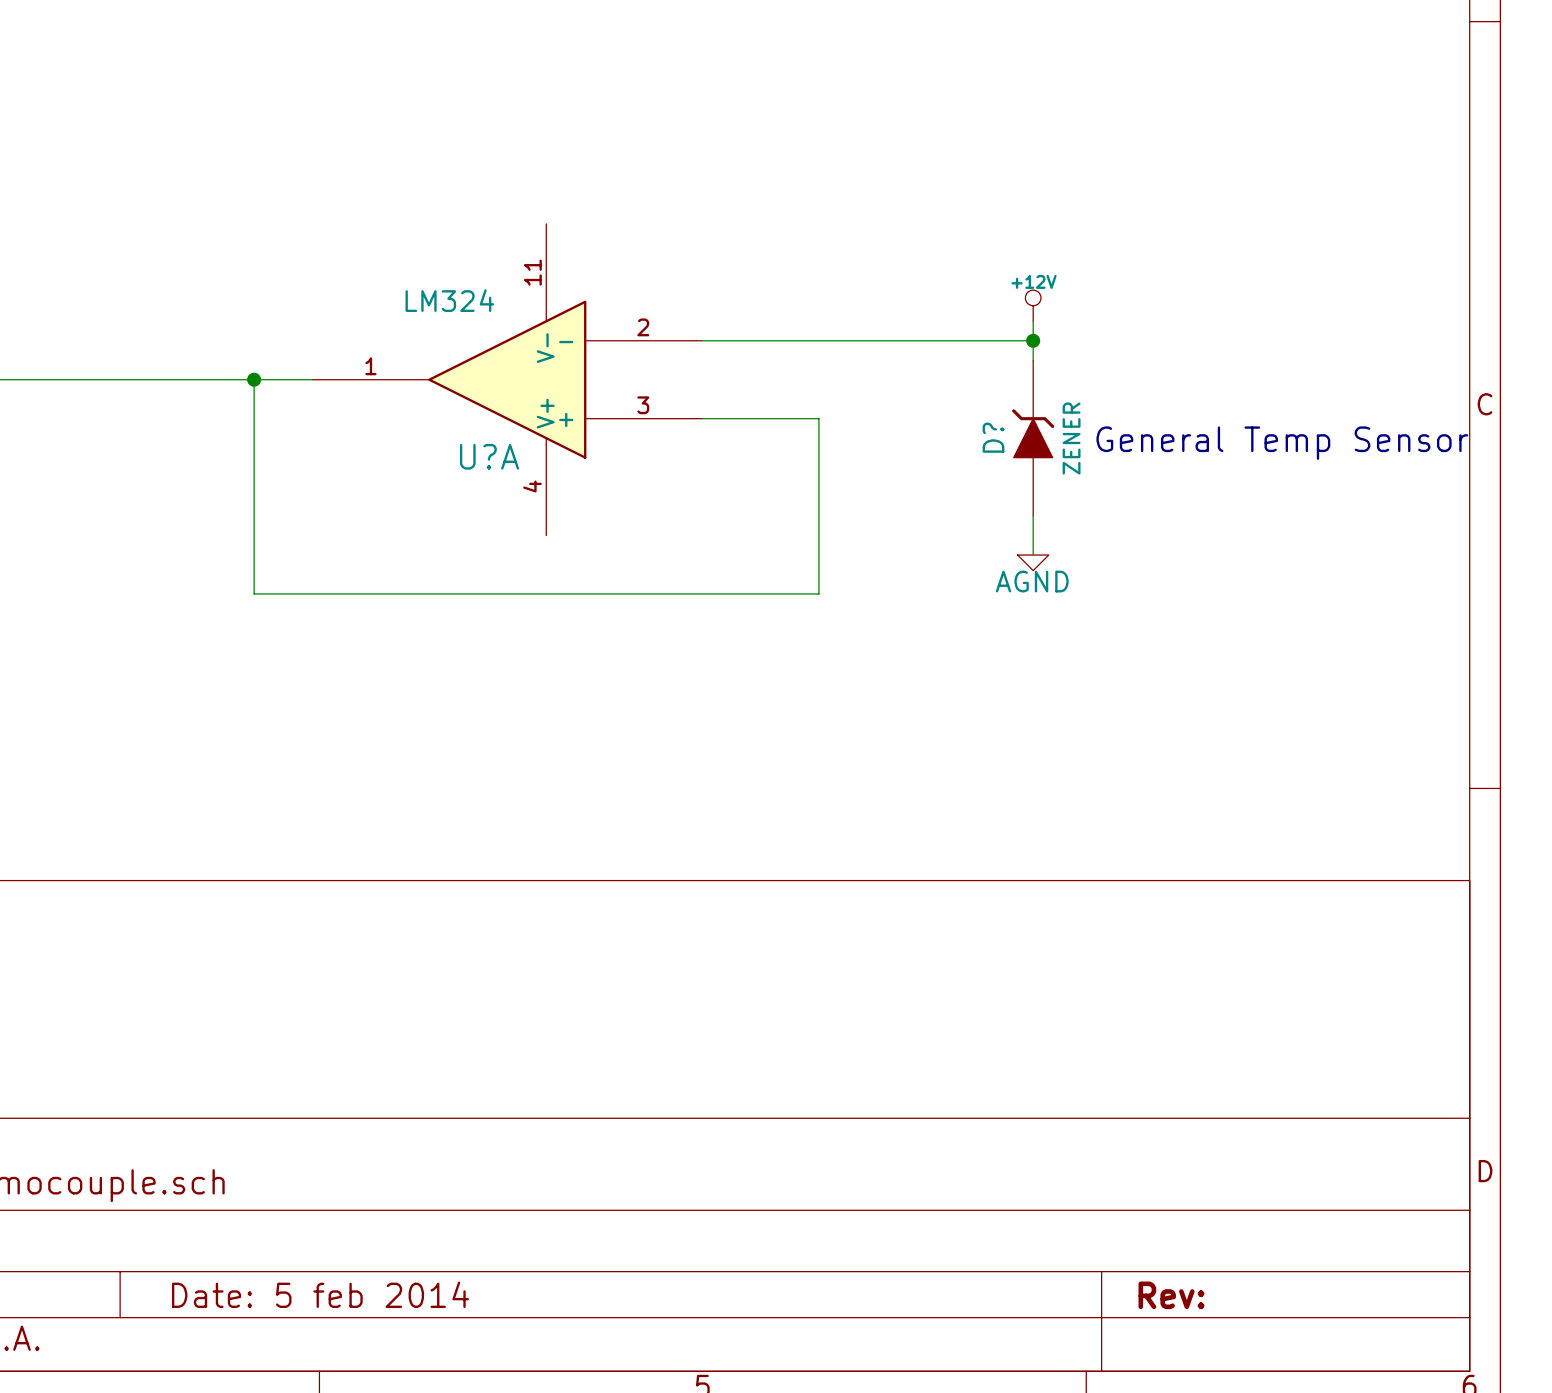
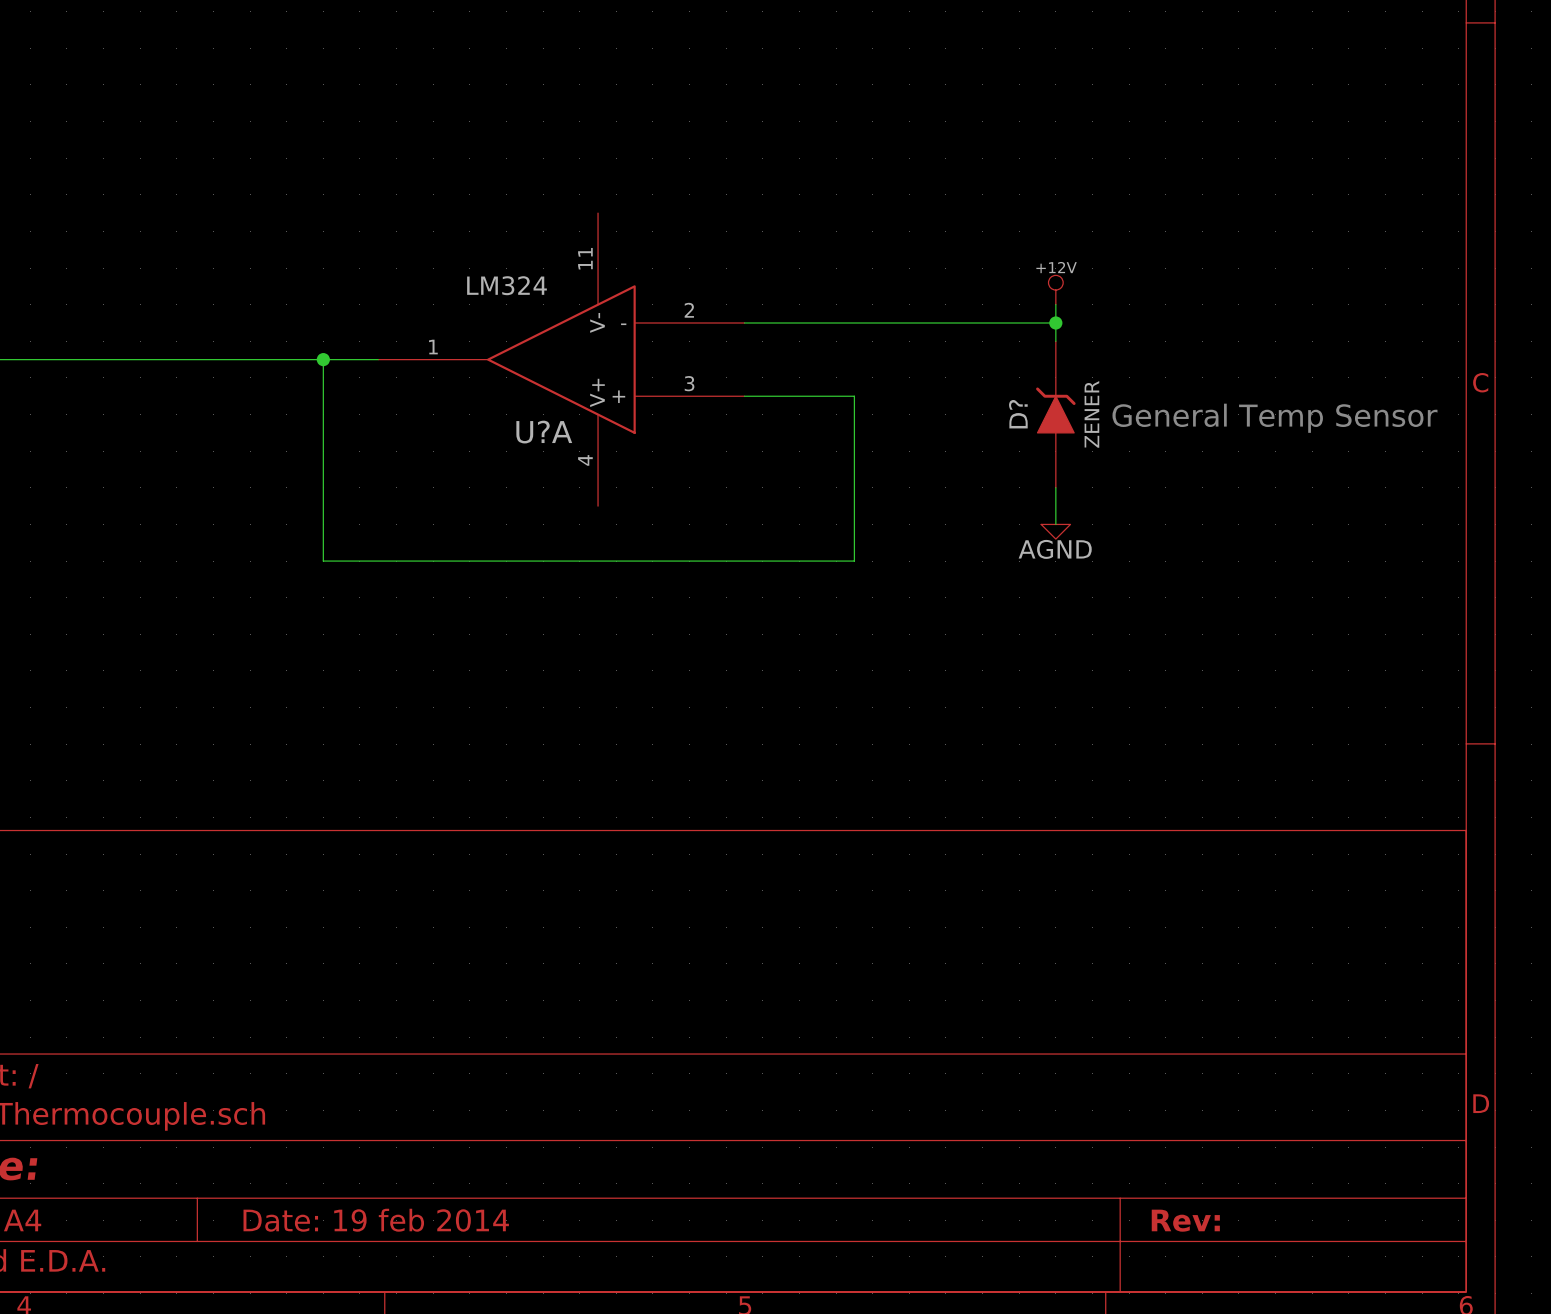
title block: Date: 5 feb 2014 (320, 1294) -> Date: 19 feb 2014 (376, 1220)

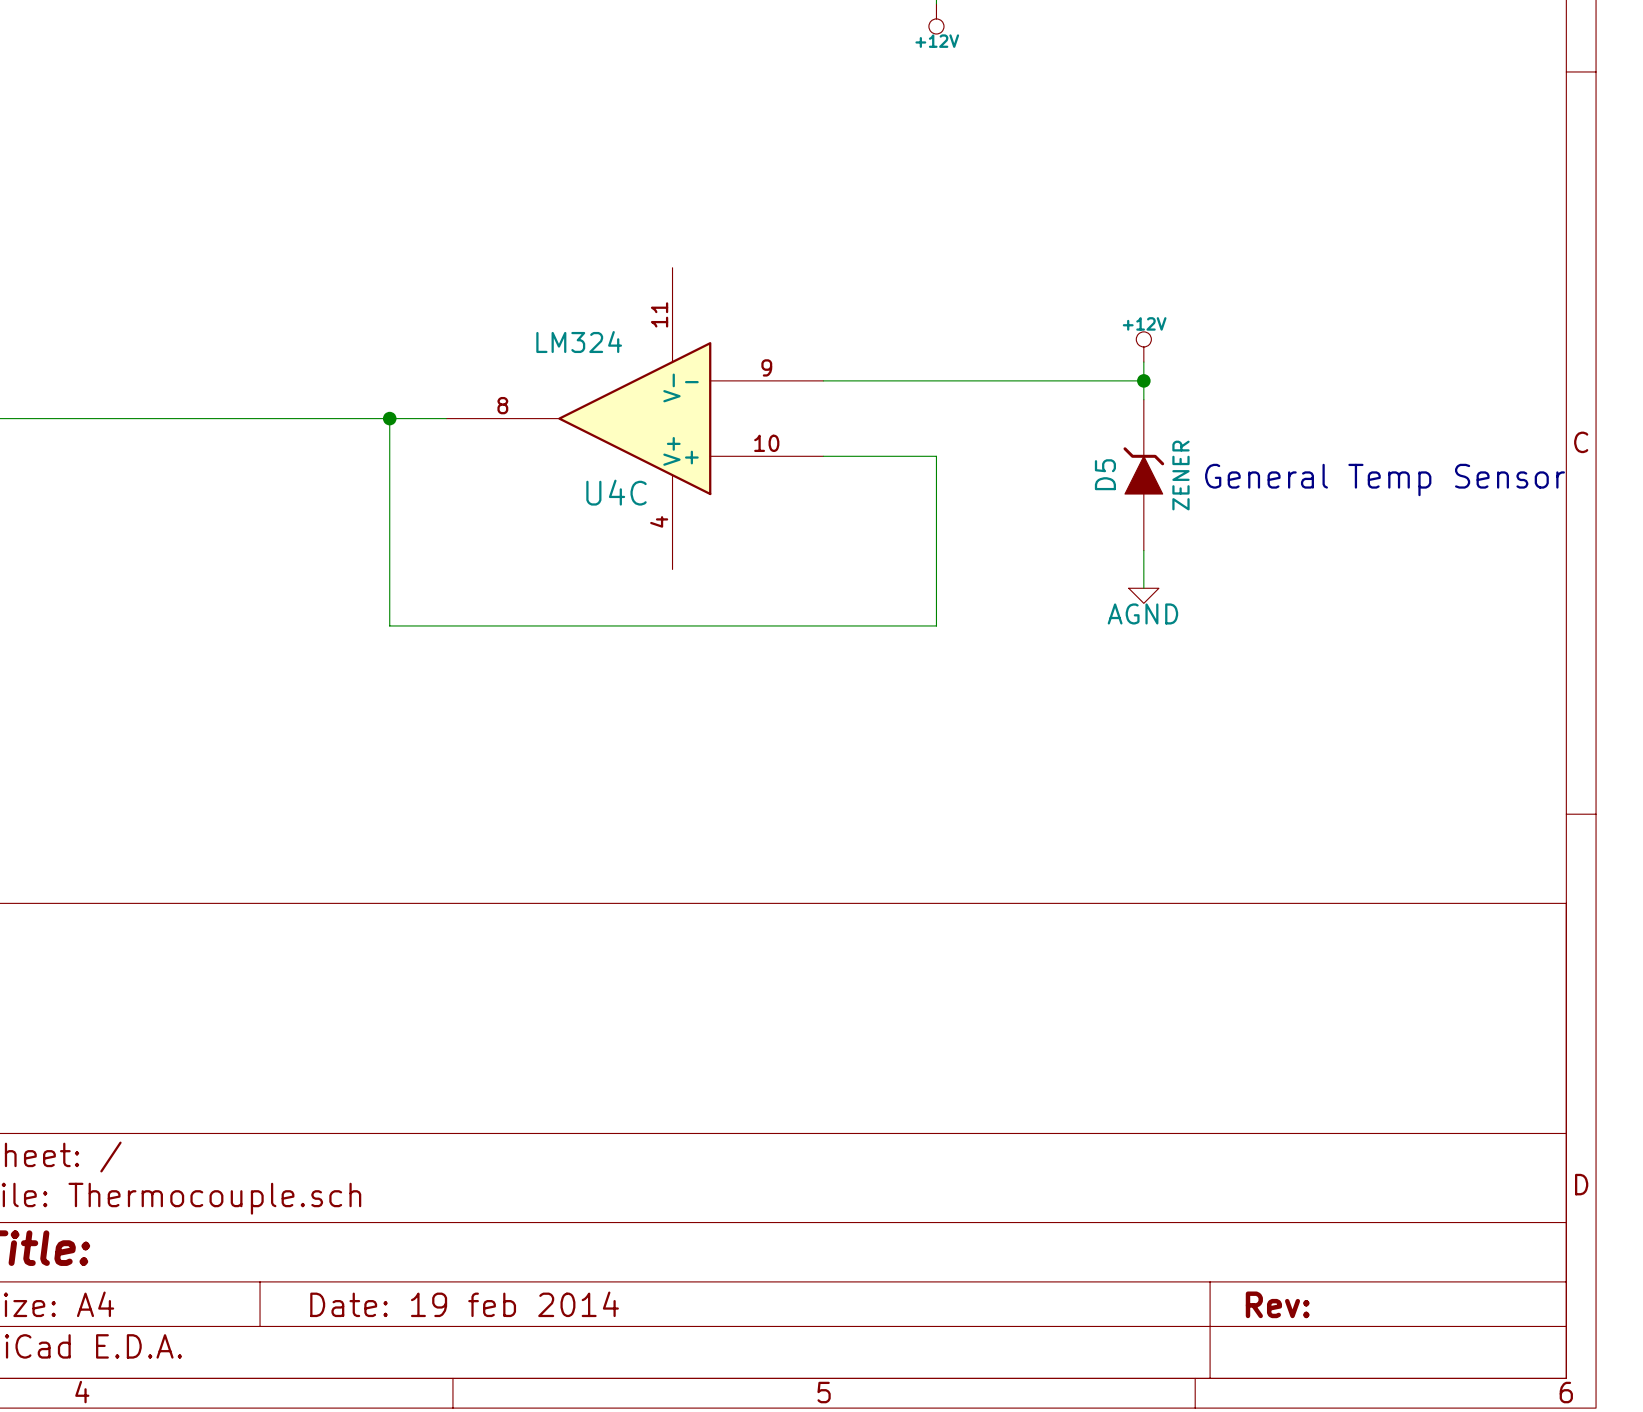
U?A pin number: 2 (689, 310) -> 9 (766, 367)
U?A pin number: 1 (433, 347) -> 8 (502, 405)
U?A pin number: 3 (689, 383) -> 10 (766, 443)
D? name: D? (1018, 414) -> D5 (1105, 474)
U?A name: U?A (544, 432) -> U4C (616, 492)

